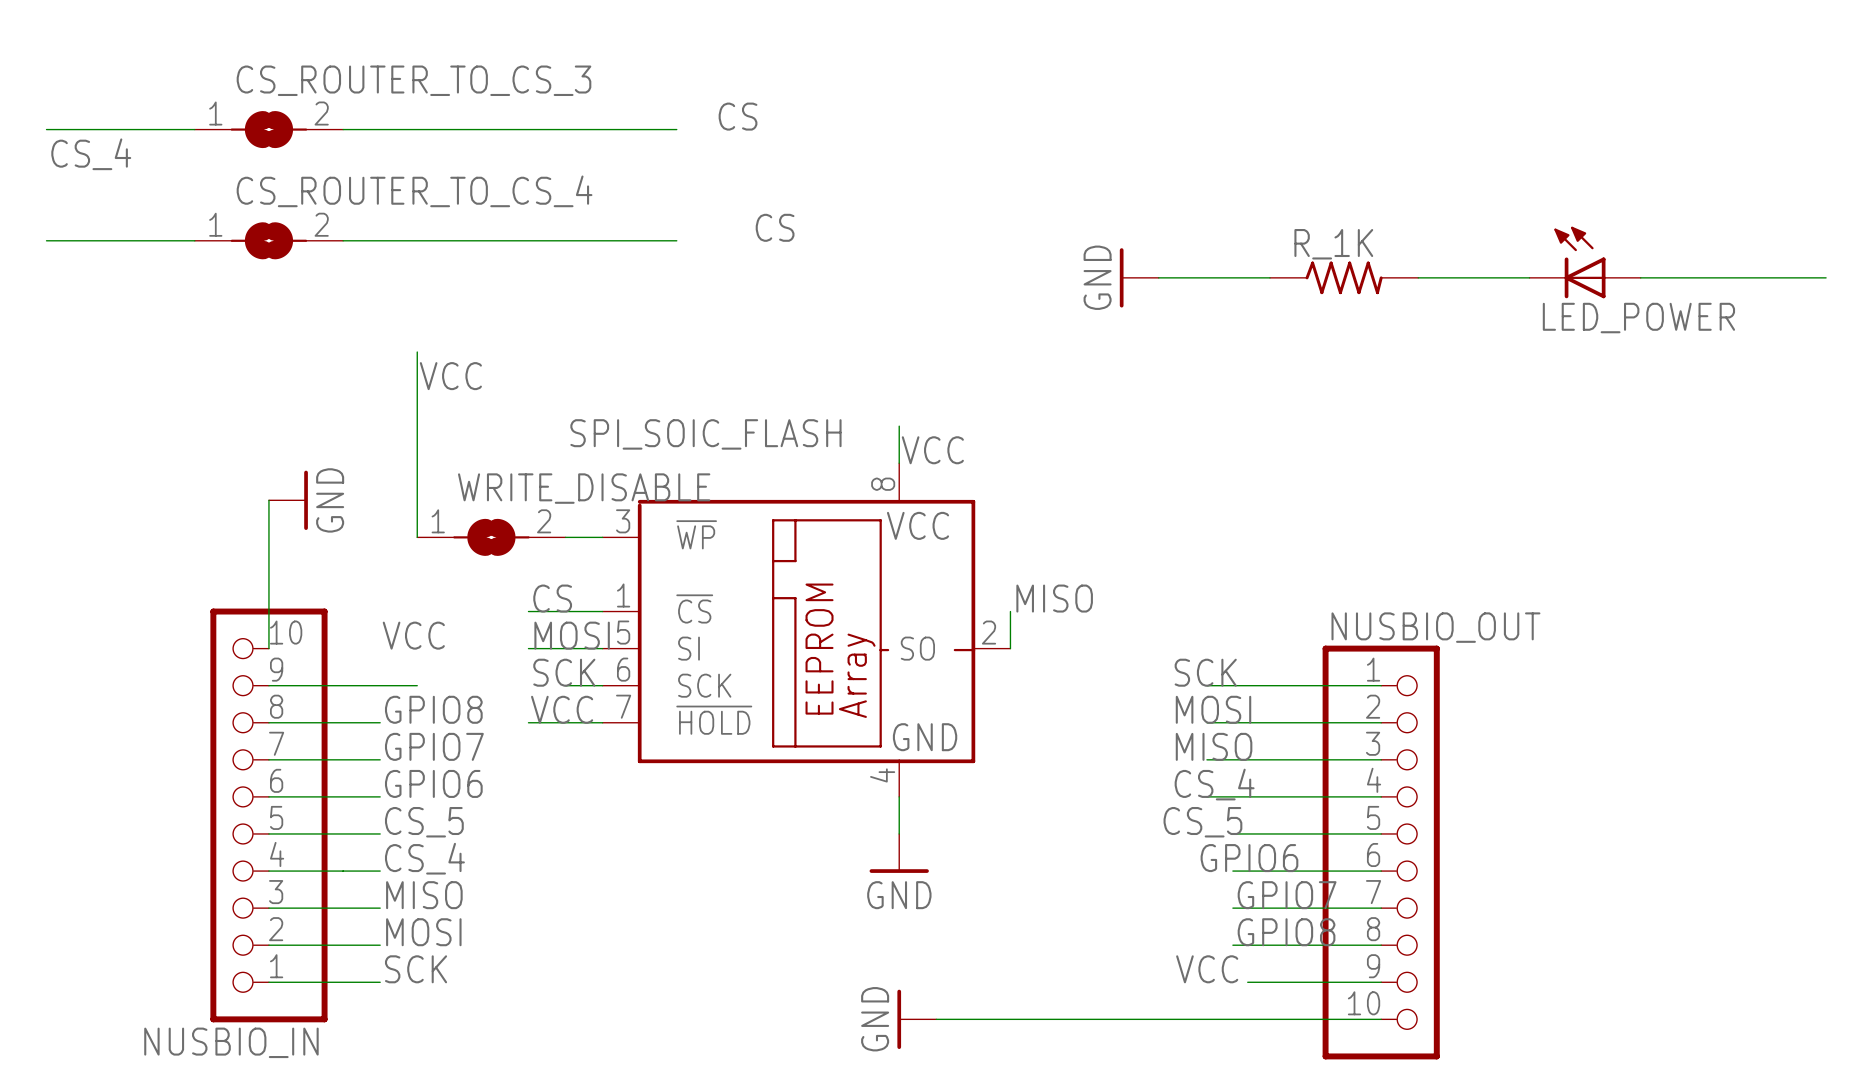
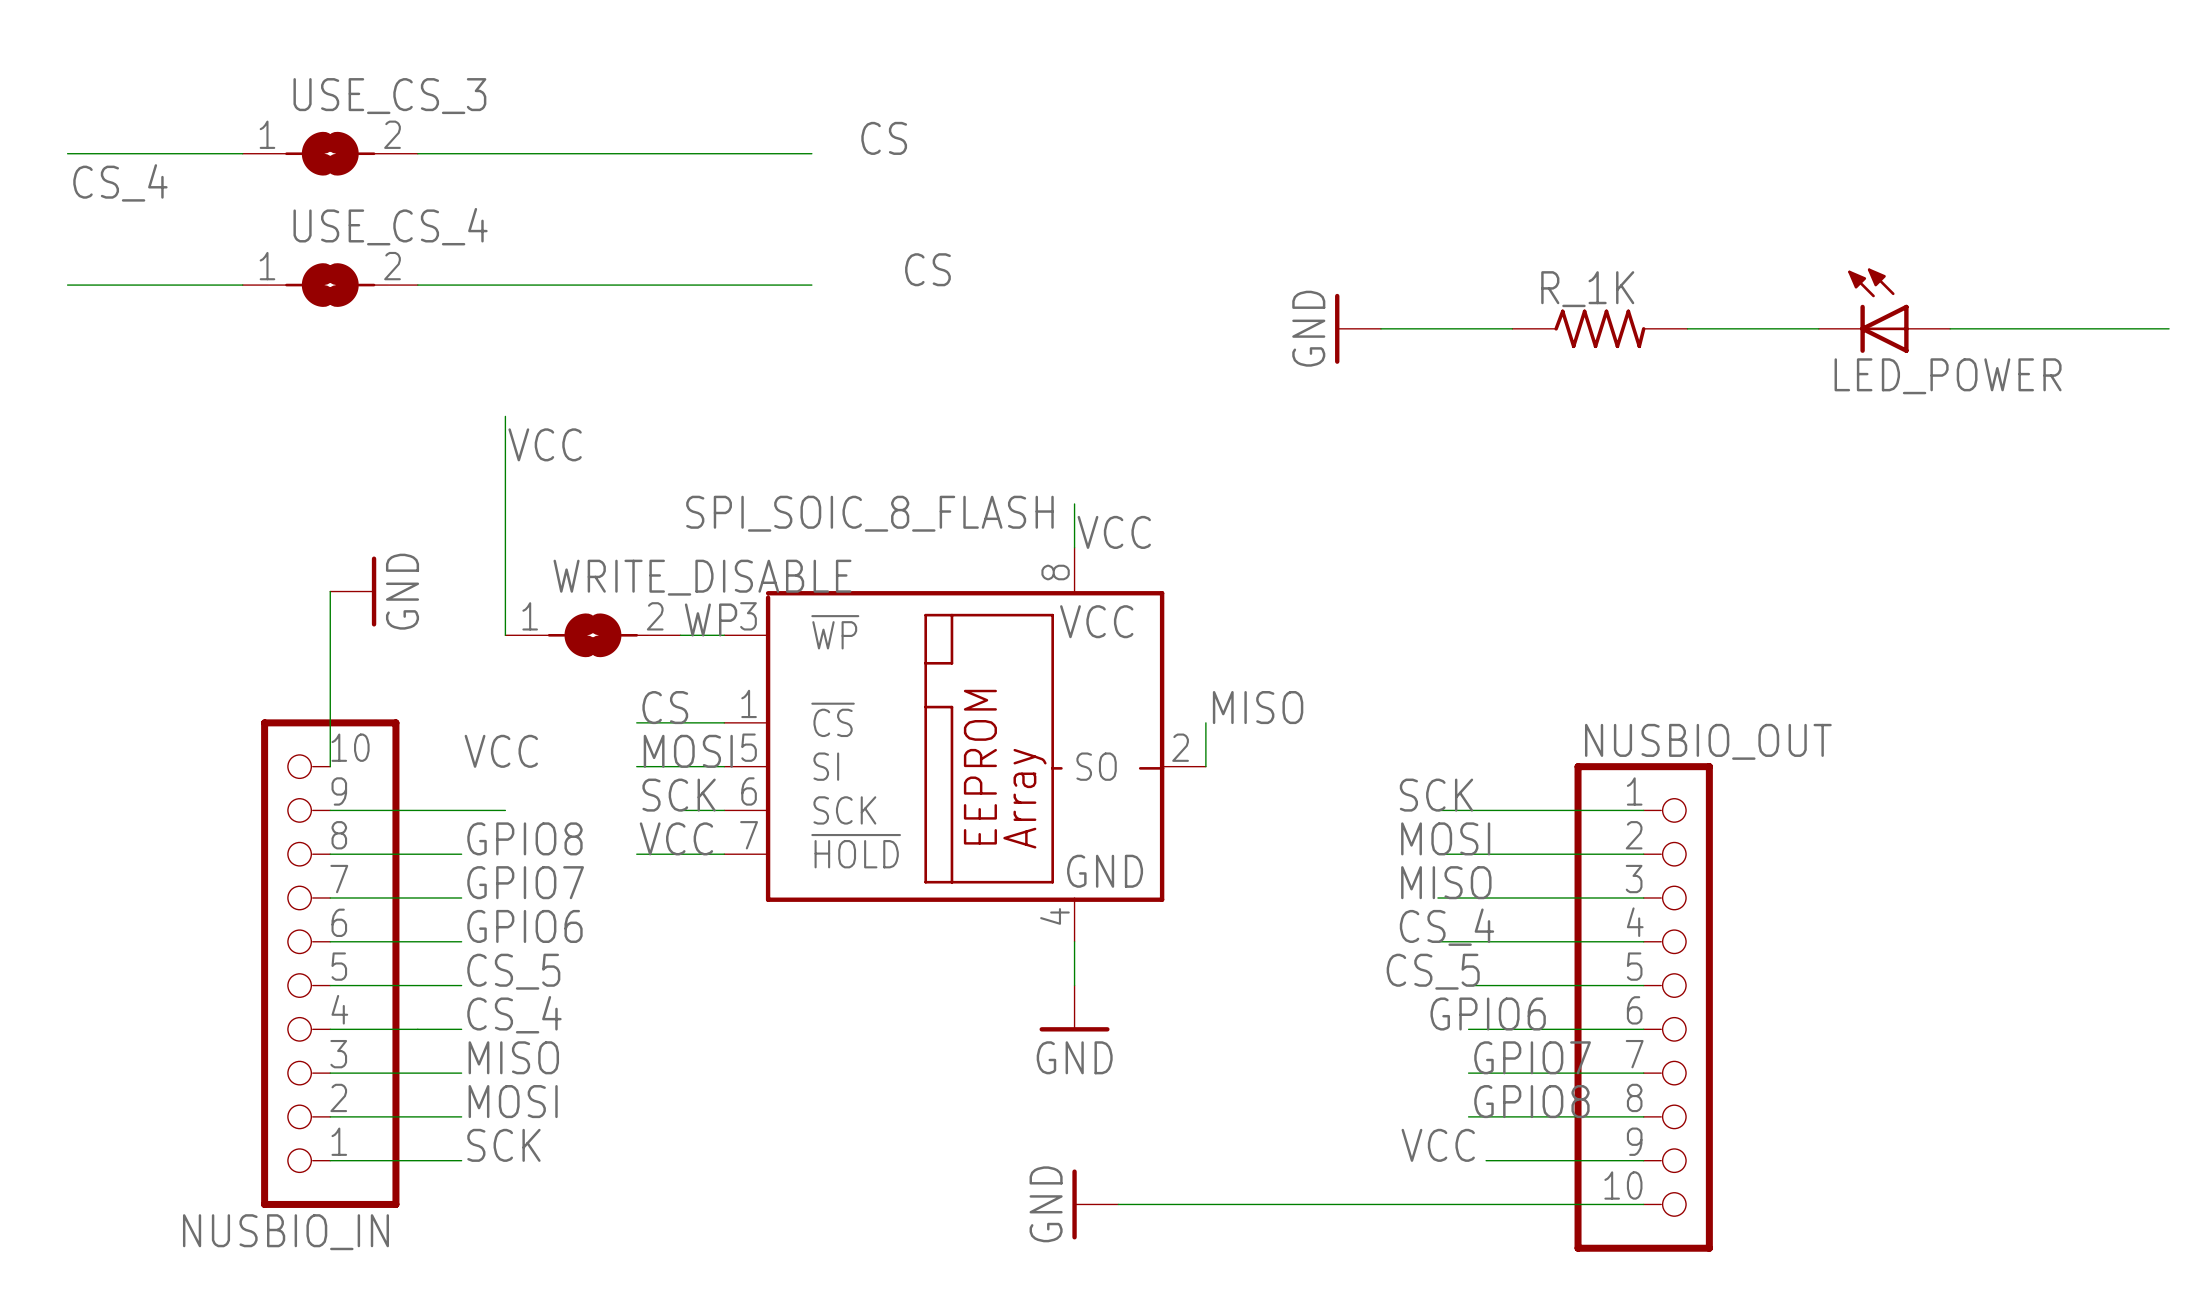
CS_ROUTER_TO_CS_3 name: CS_ROUTER_TO_CS_3 (413, 80) -> USE_CS_3 (389, 96)
CS_ROUTER_TO_CS_4 name: CS_ROUTER_TO_CS_4 (414, 191) -> USE_CS_4 (390, 226)
SPI_SOIC_FLASH name: SPI_SOIC_FLASH (705, 434) -> SPI_SOIC_8_FLASH (869, 513)
label: none -> WP (711, 619)

